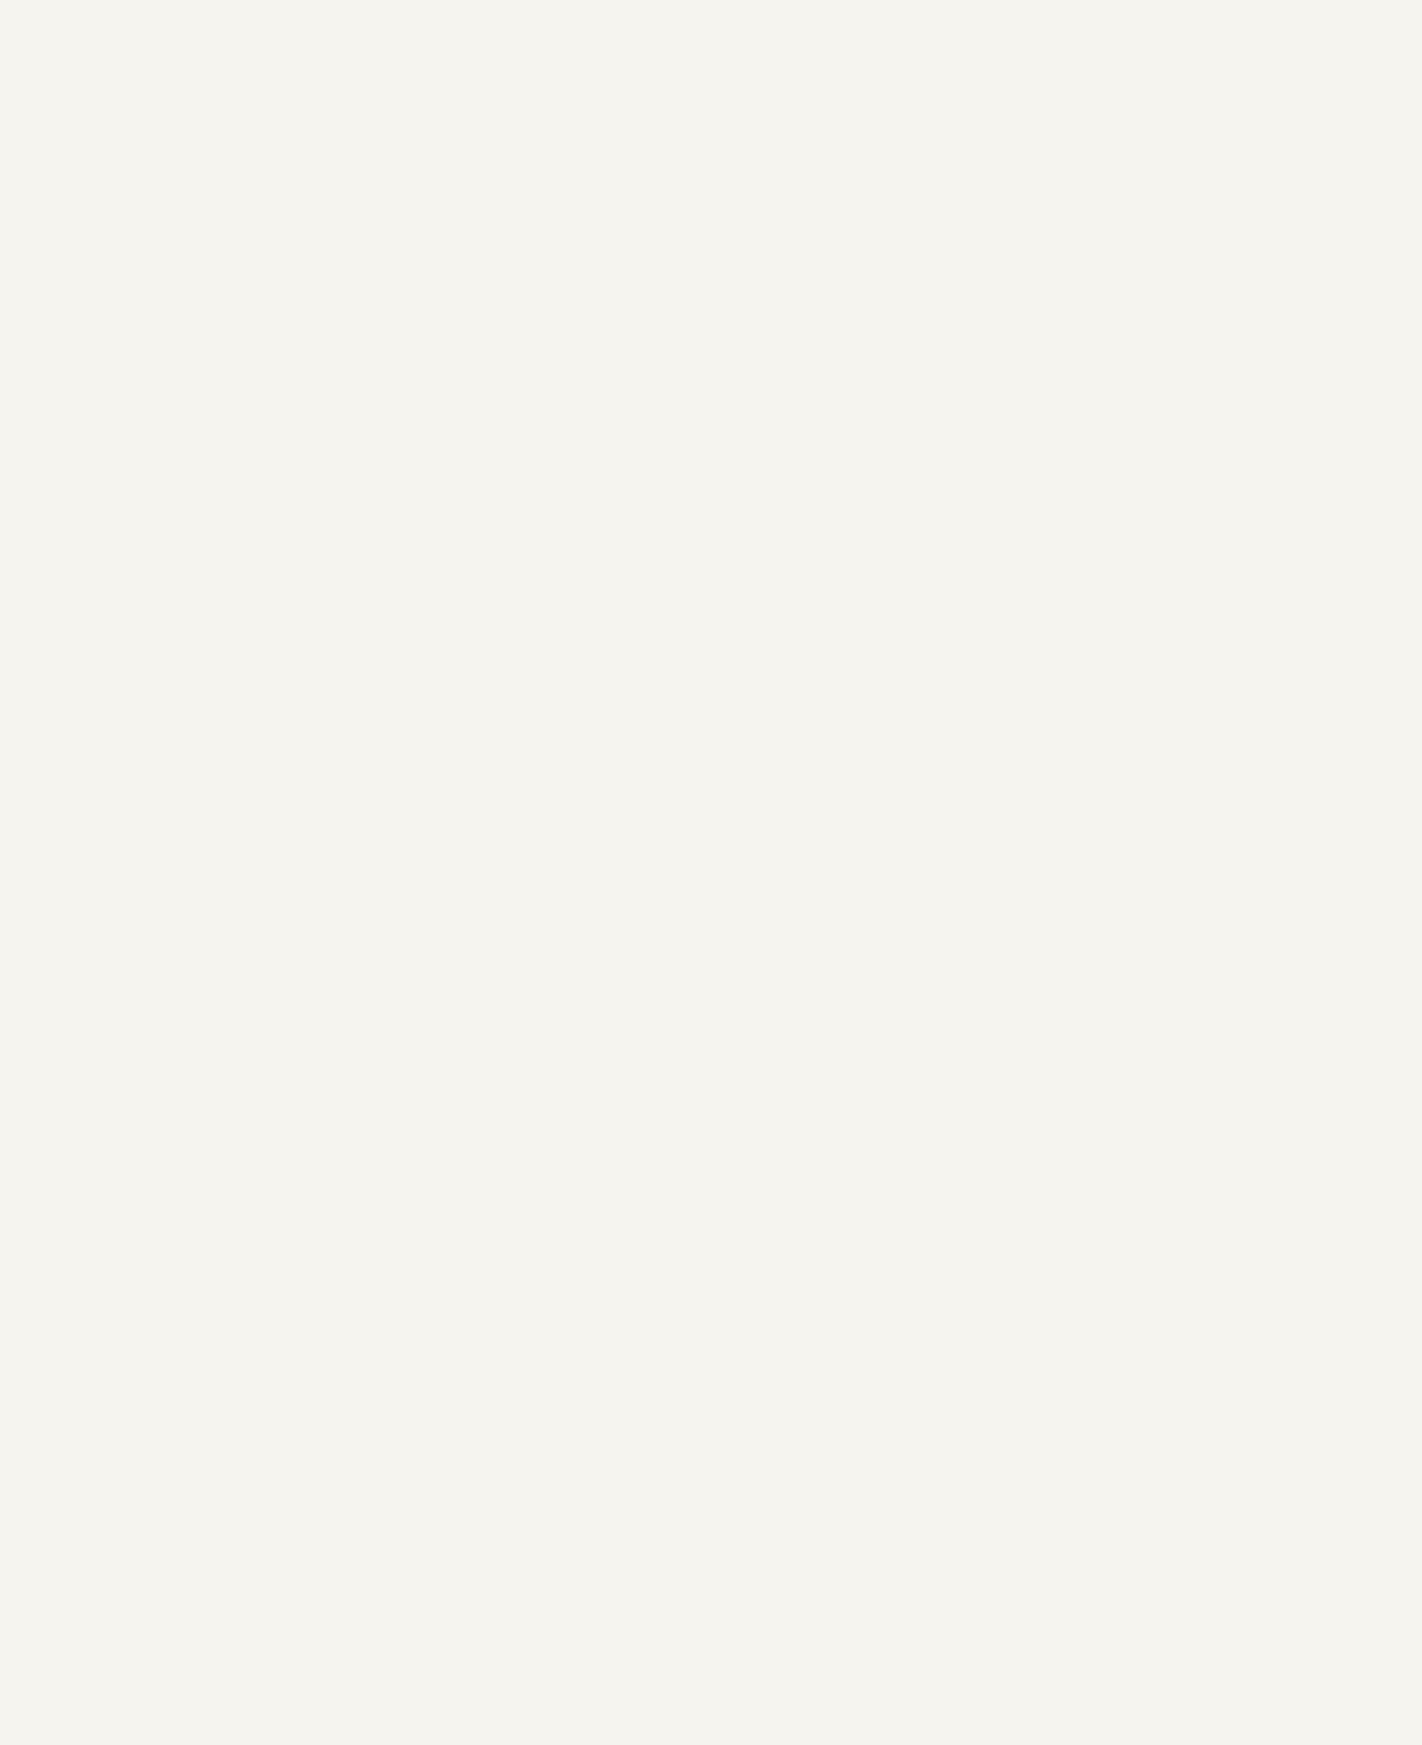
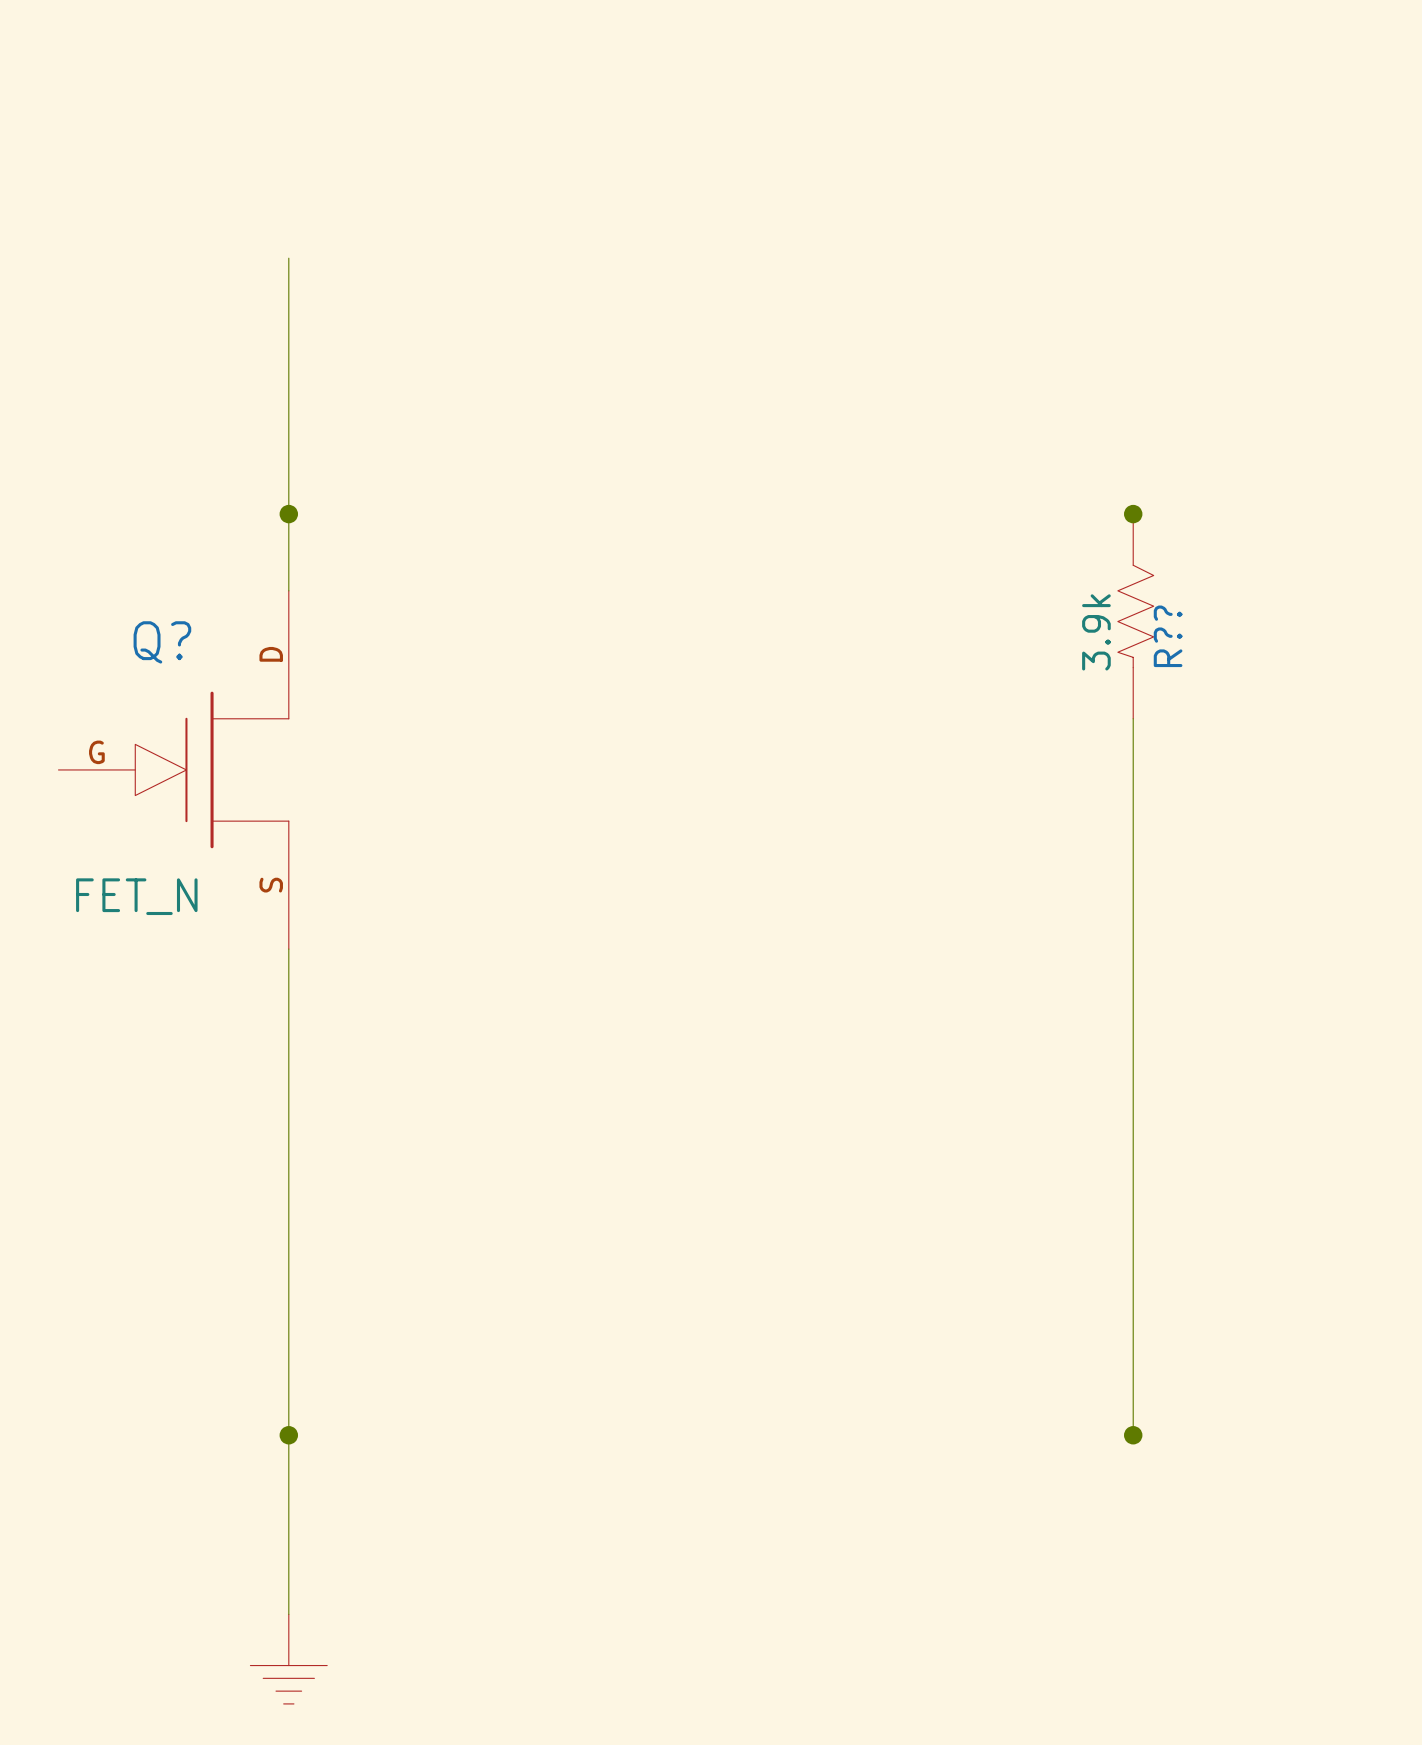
wire: none -> (288, 258) (288, 590)
junction: none -> (288, 514)
junction: none -> (1133, 514)
R??: none -> 3.9k (1135, 616)
wire: none -> (1133, 718) (1133, 1435)
Q?: none -> FET_N (173, 769)
wire: none -> (288, 949) (288, 1614)
junction: none -> (288, 1435)
junction: none -> (1133, 1435)
power symbol: none -> (288, 1659)

